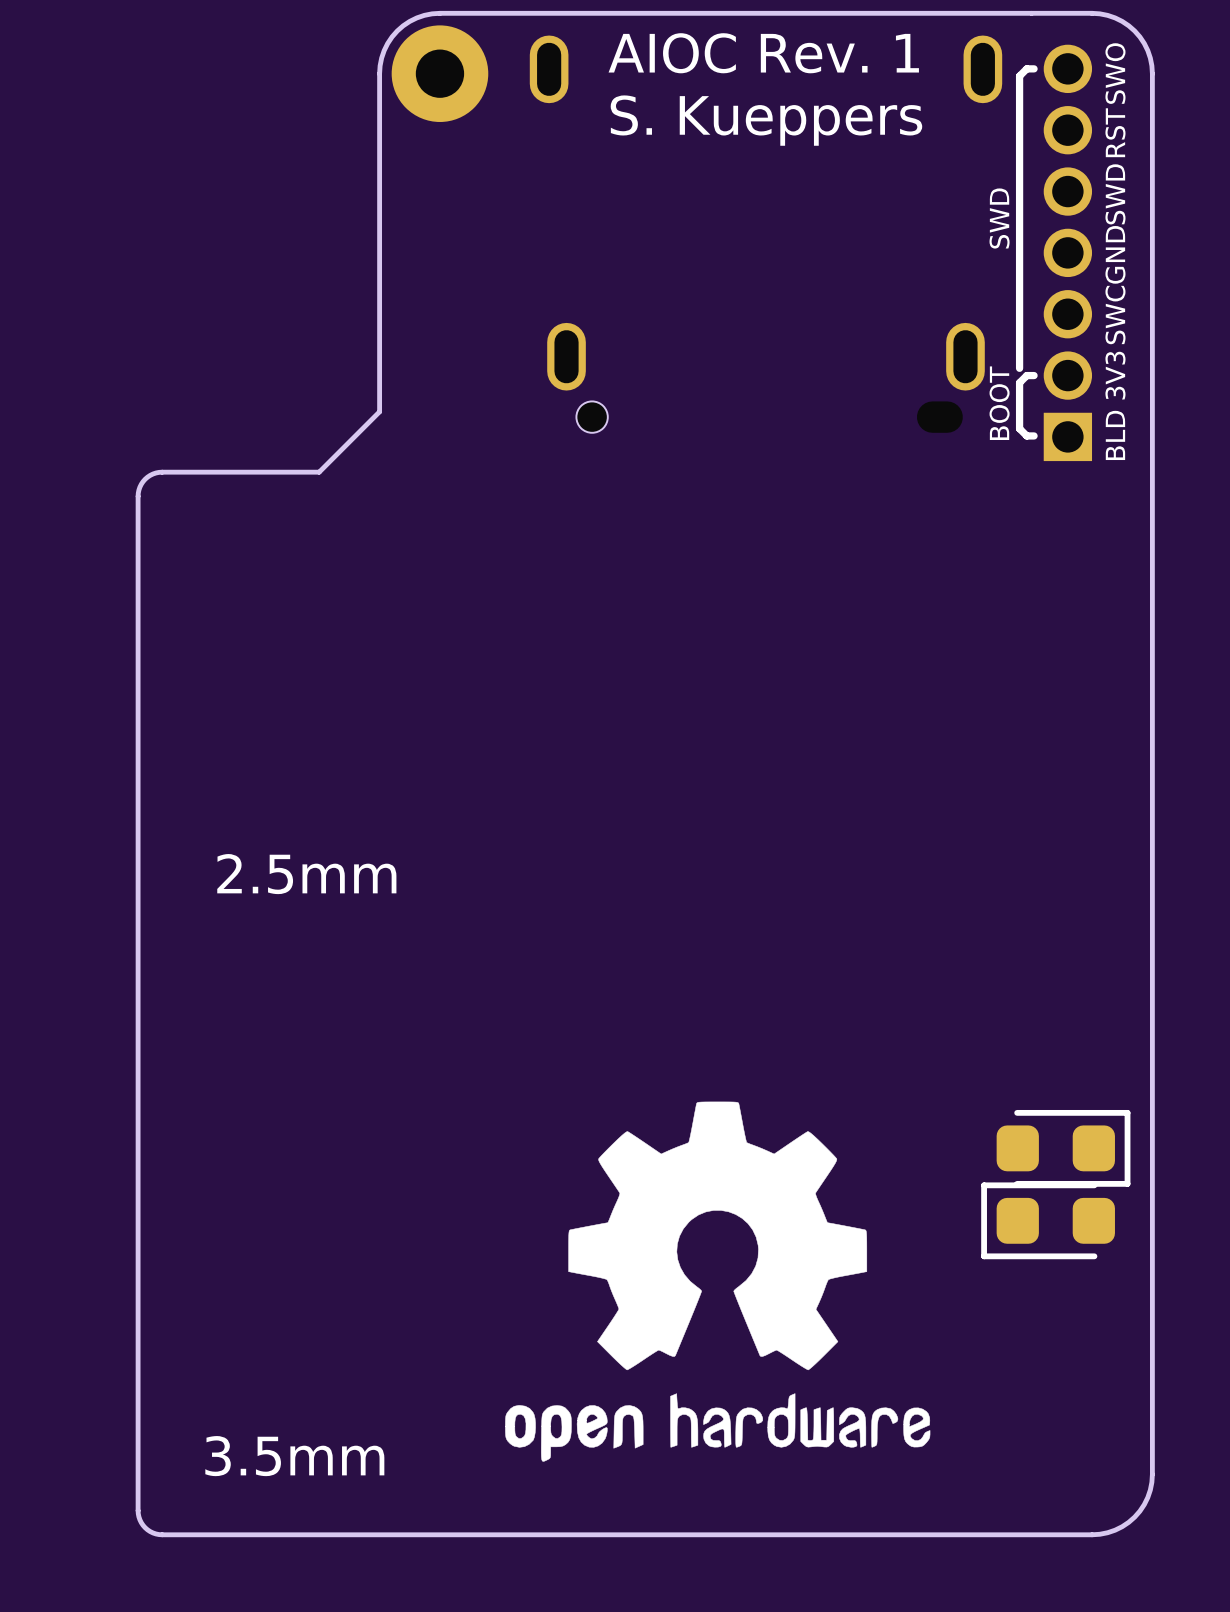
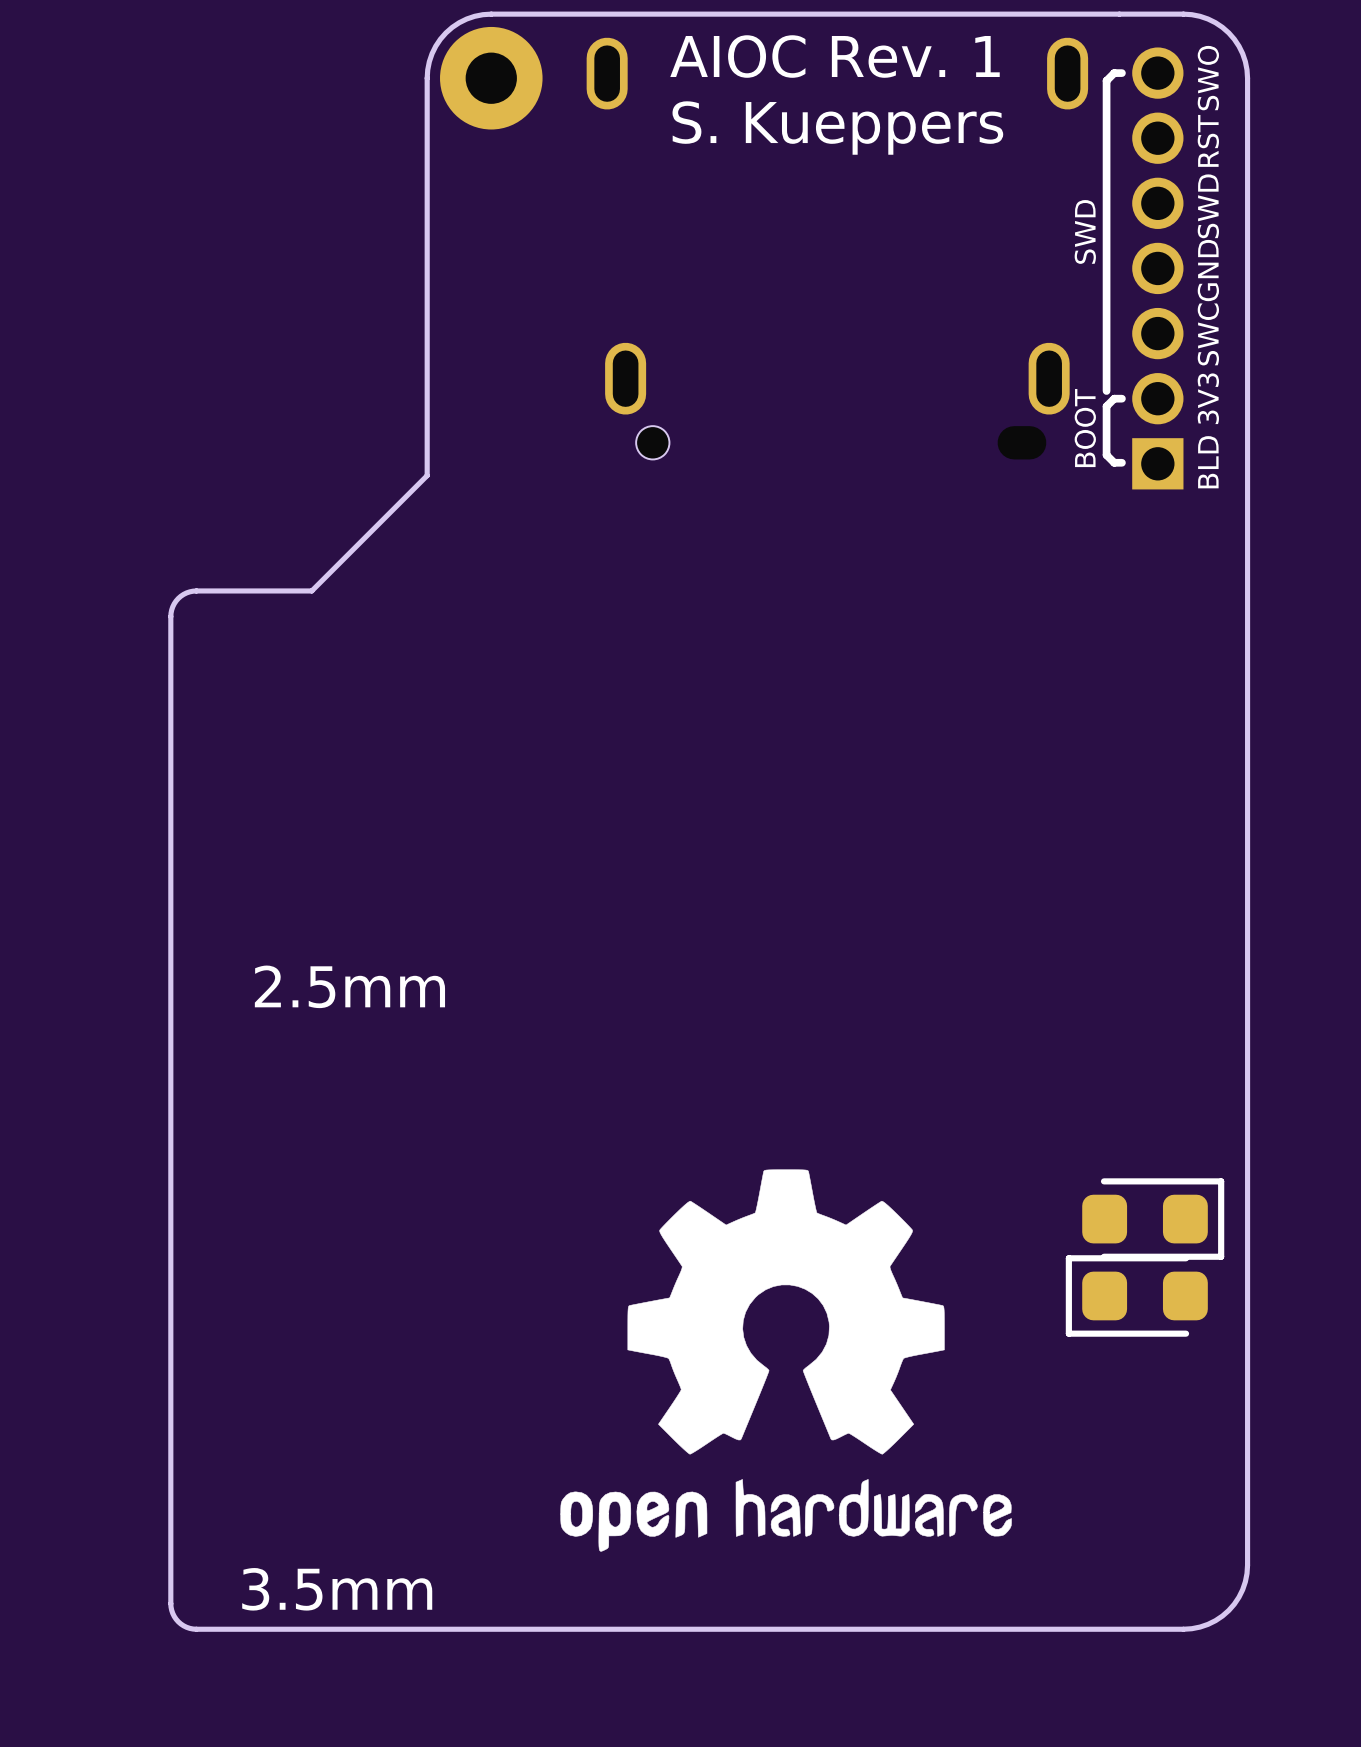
board edge: (379, 411) (319, 472) (162, 472) (147, 477) (141, 484) (138, 493) (138, 580) -> (427, 437) (427, 475) (311, 590) (193, 591) (178, 598) (172, 606) (170, 616)
text position: 2.5mm (306, 874) -> 2.5mm (349, 986)
text position: 3.5mm (294, 1456) -> 3.5mm (337, 1589)

